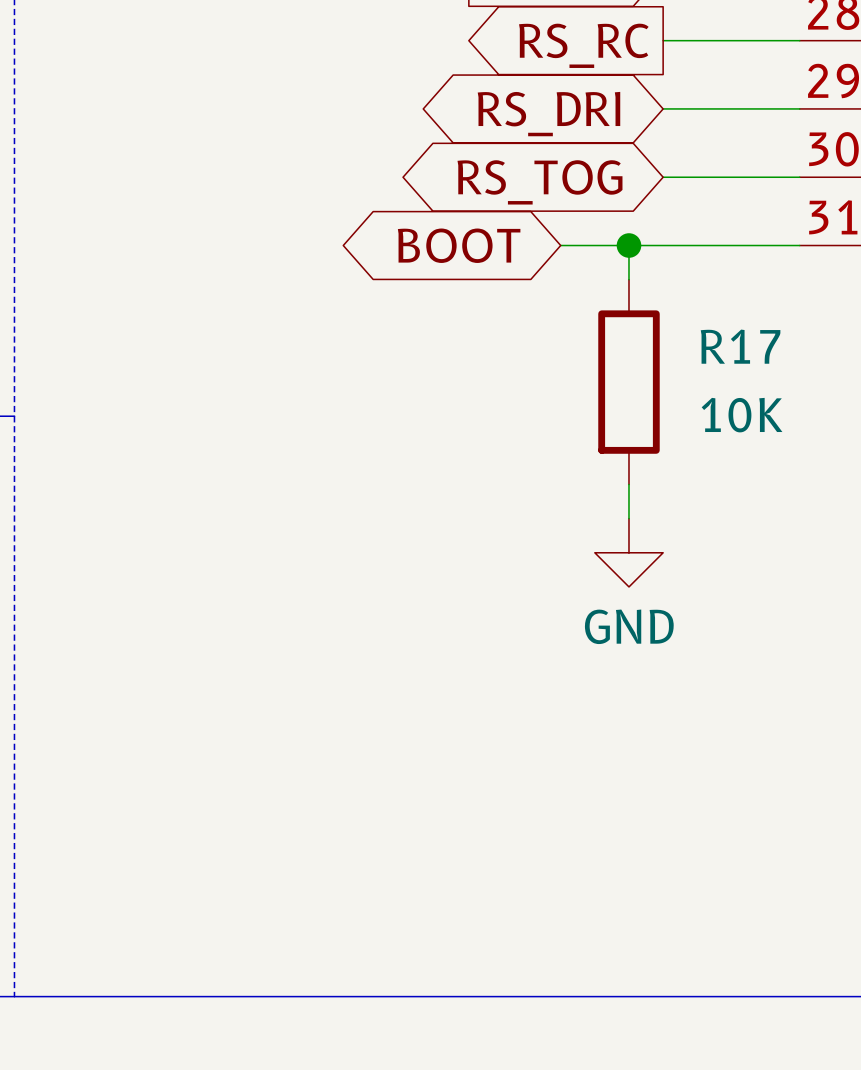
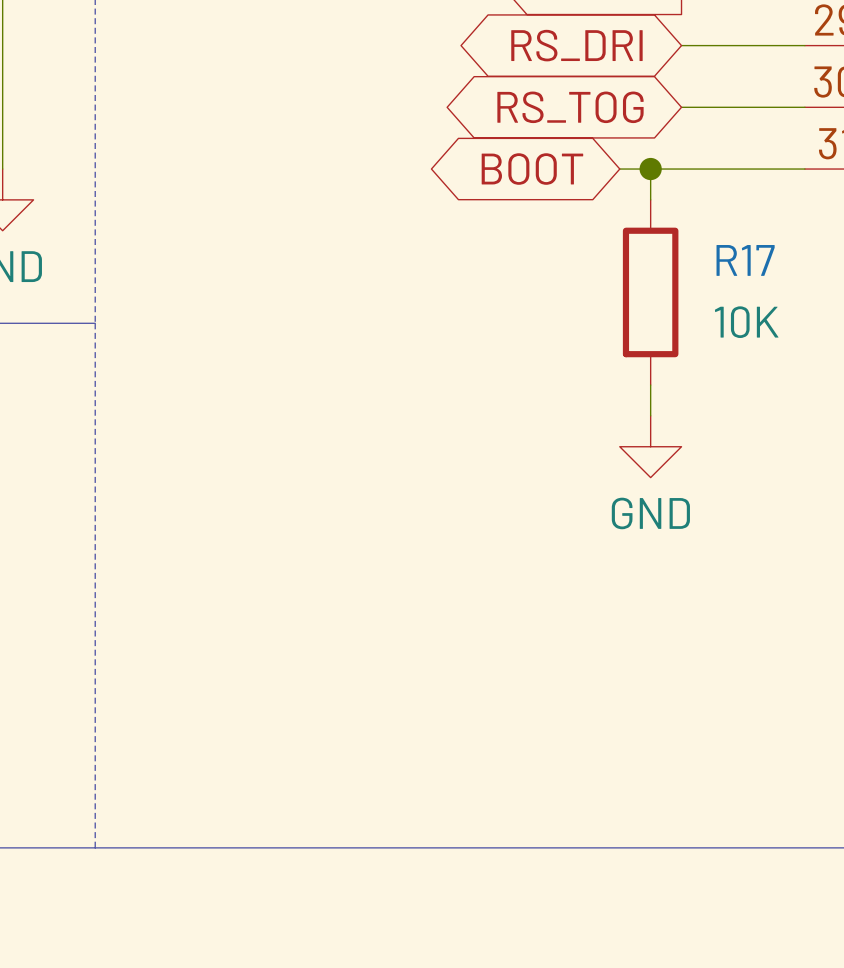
global label position: BOOT (459, 245) -> BOOT (532, 169)
wire: (560, 245) (594, 245) -> none

